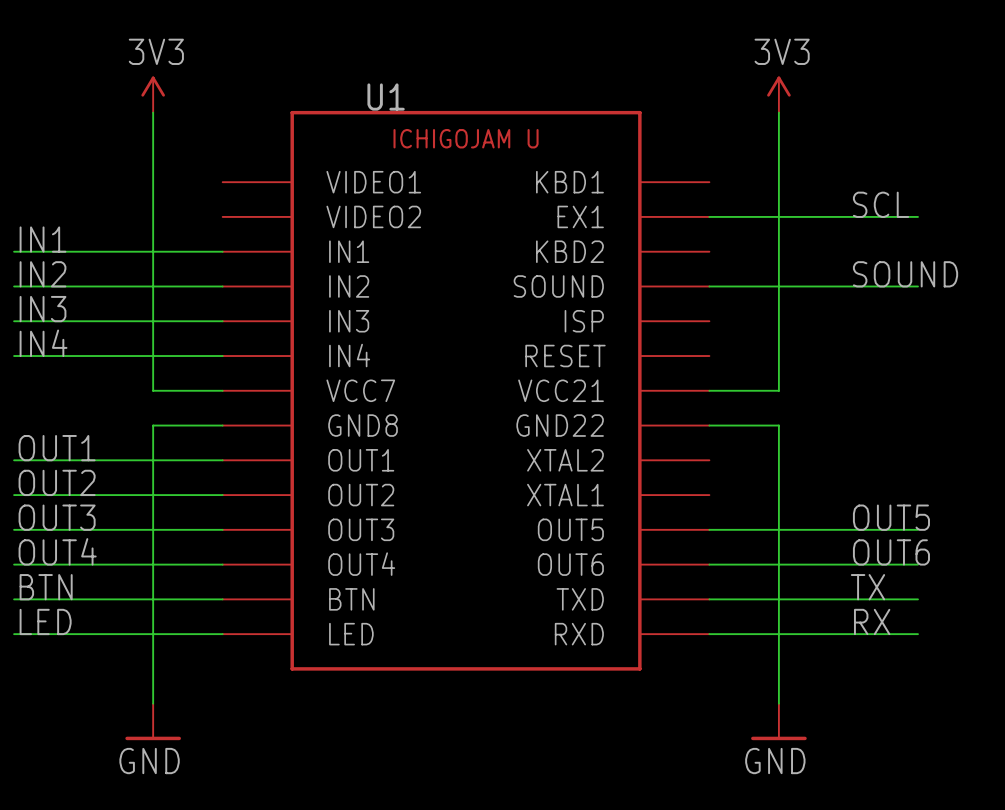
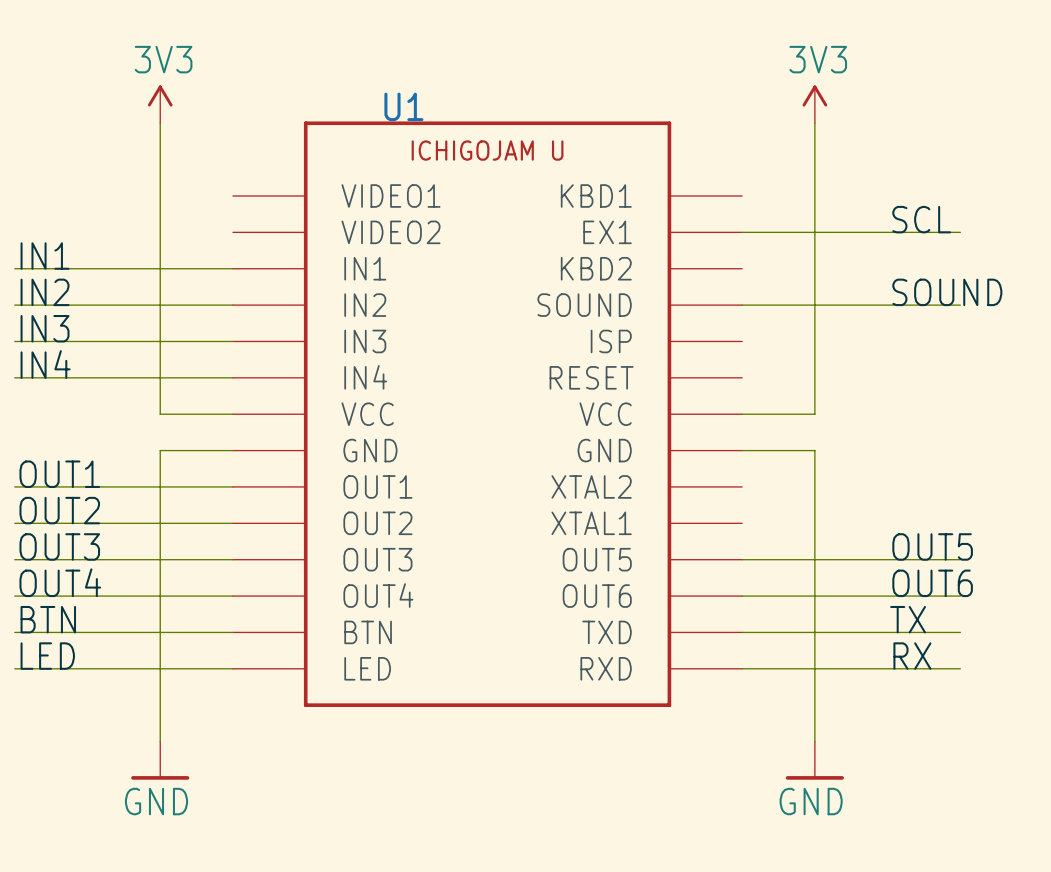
U1 pin name: VCC7 (360, 390) -> VCC (367, 414)
U1 pin name: VCC21 (561, 390) -> VCC (605, 414)
U1 pin name: GND8 (363, 425) -> GND (370, 450)
U1 pin name: GND22 (560, 425) -> GND (604, 450)

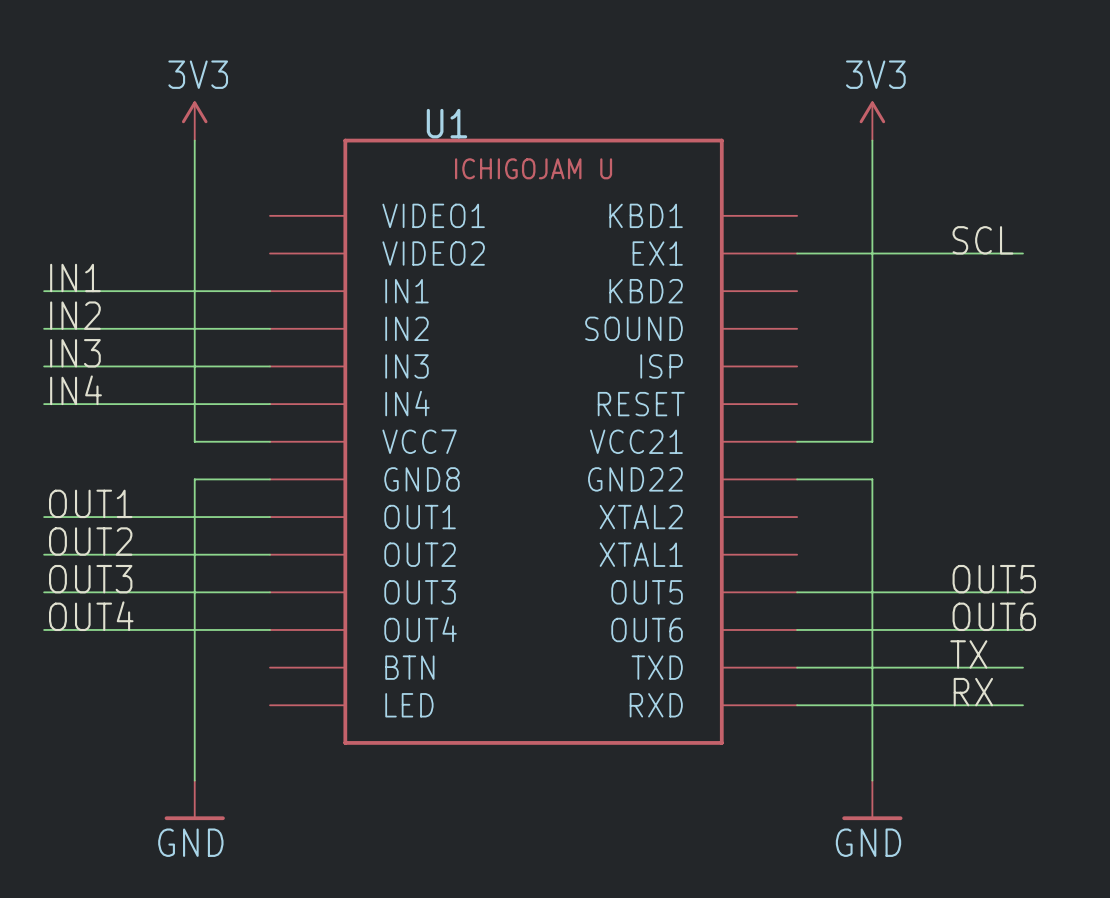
label: SOUND (947, 292) -> none
wire: (742, 305) (960, 305) -> none
U1 pin name: VCC (367, 414) -> VCC7 (419, 441)
U1 pin name: VCC (605, 414) -> VCC21 (636, 441)
U1 pin name: GND (370, 450) -> GND8 (422, 479)
U1 pin name: GND (604, 450) -> GND22 (635, 479)
label: BTN (48, 619) -> none
wire: (14, 632) (232, 632) -> none
label: LED (47, 656) -> none
wire: (14, 668) (232, 668) -> none

